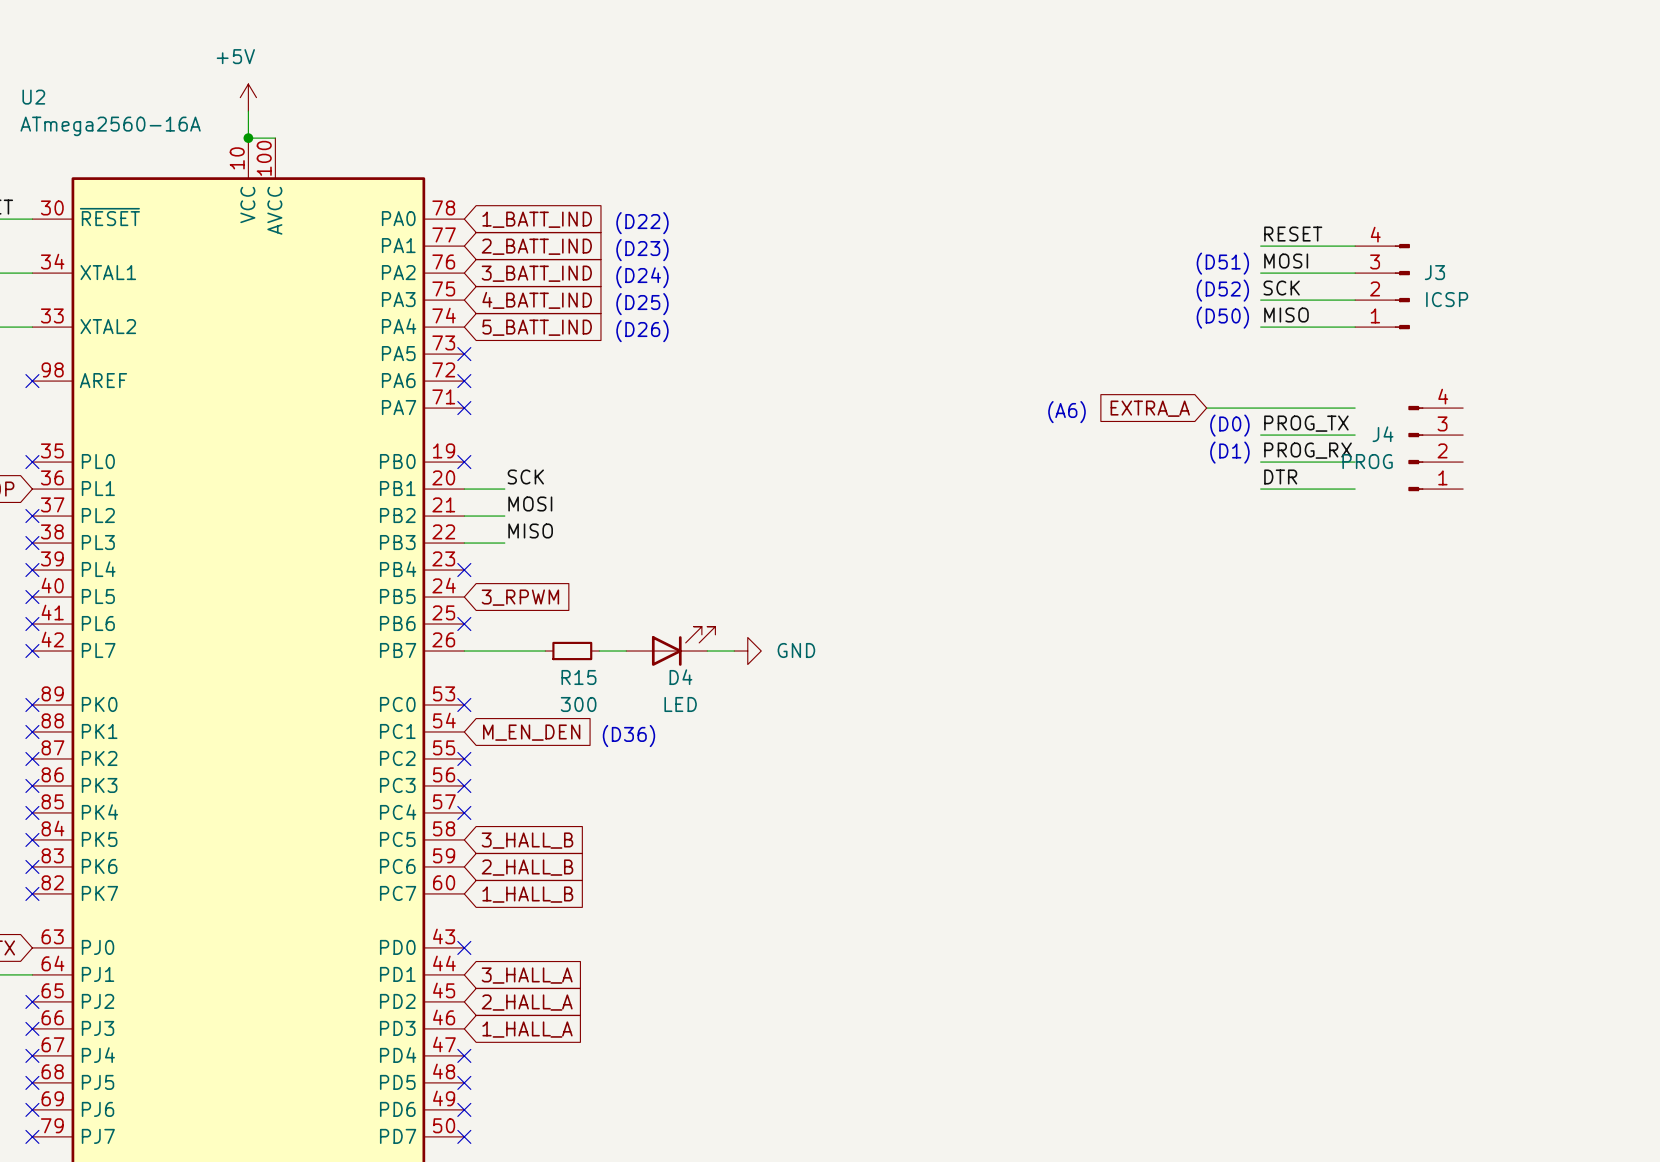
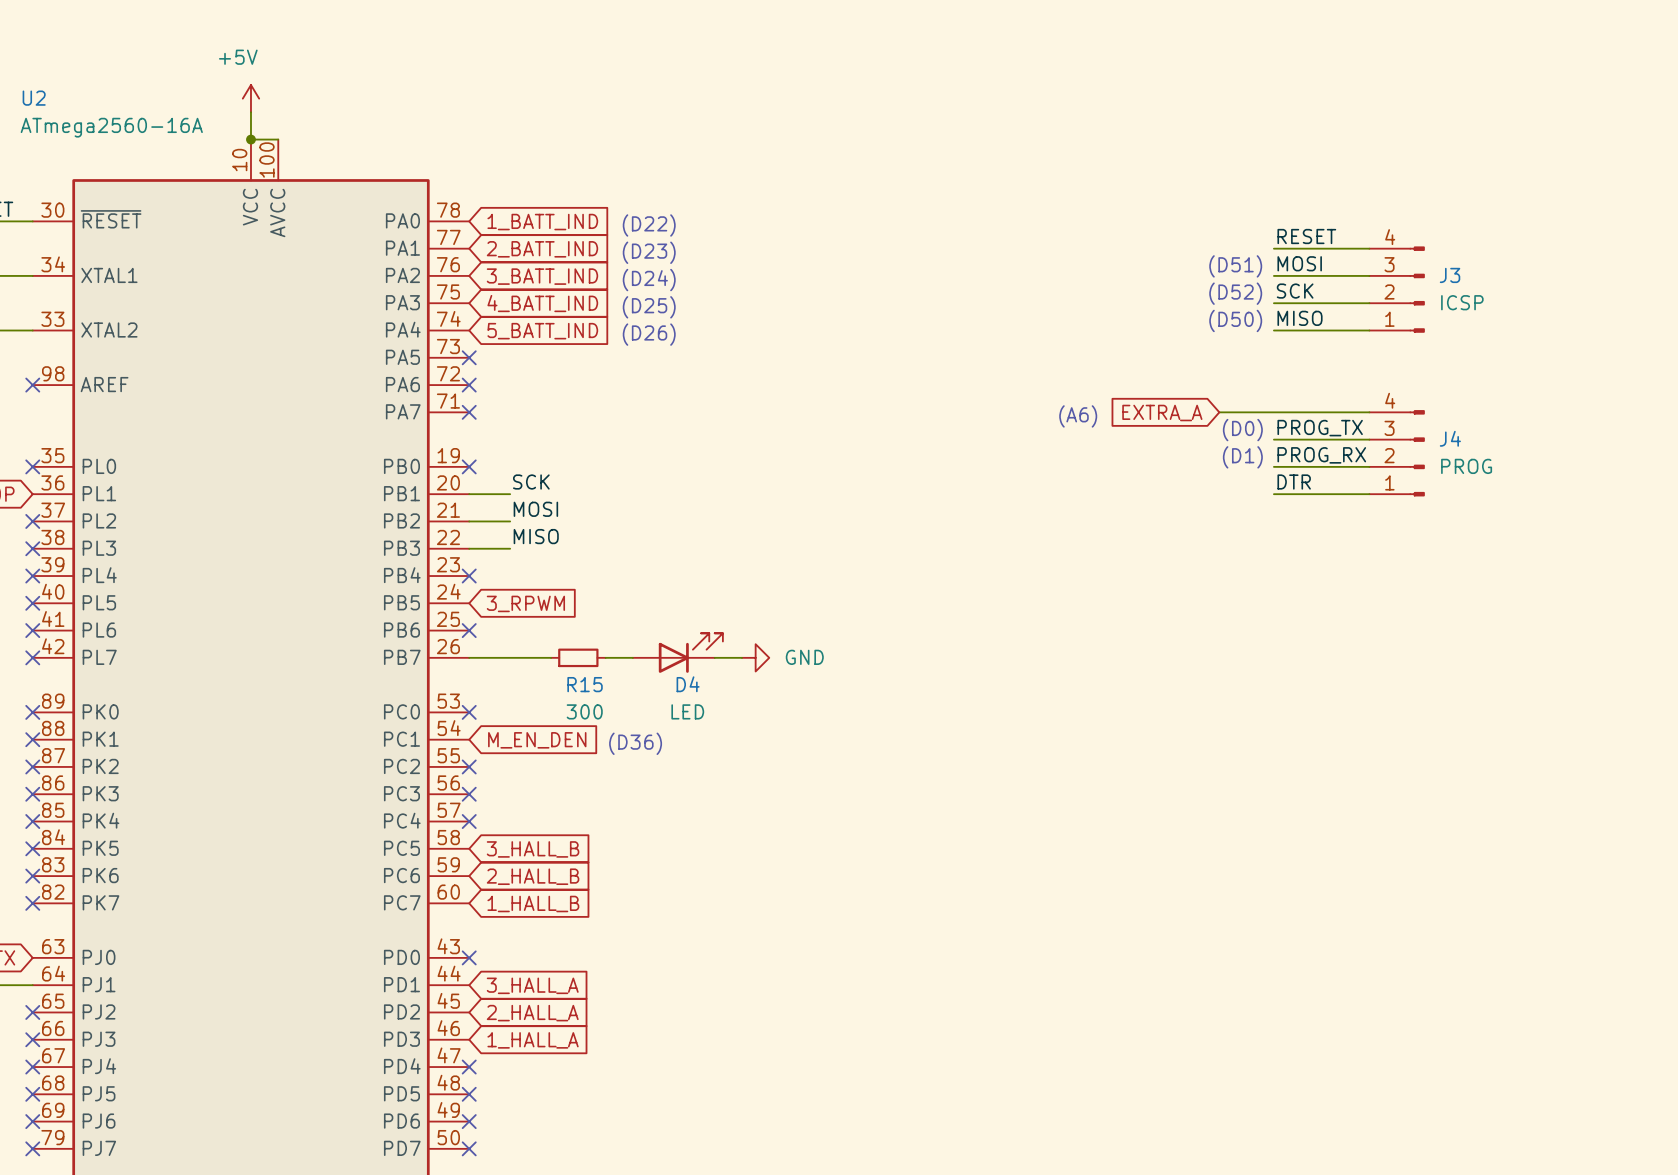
J4 flip: as is (1415, 448) -> left-right (1417, 453)
J4 position: (1435, 448) -> (1397, 453)

